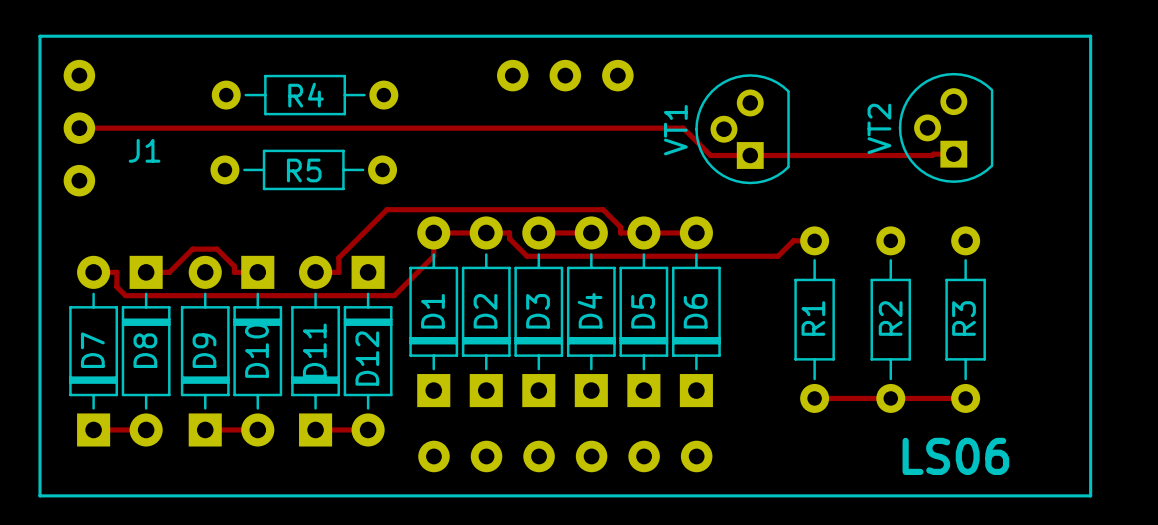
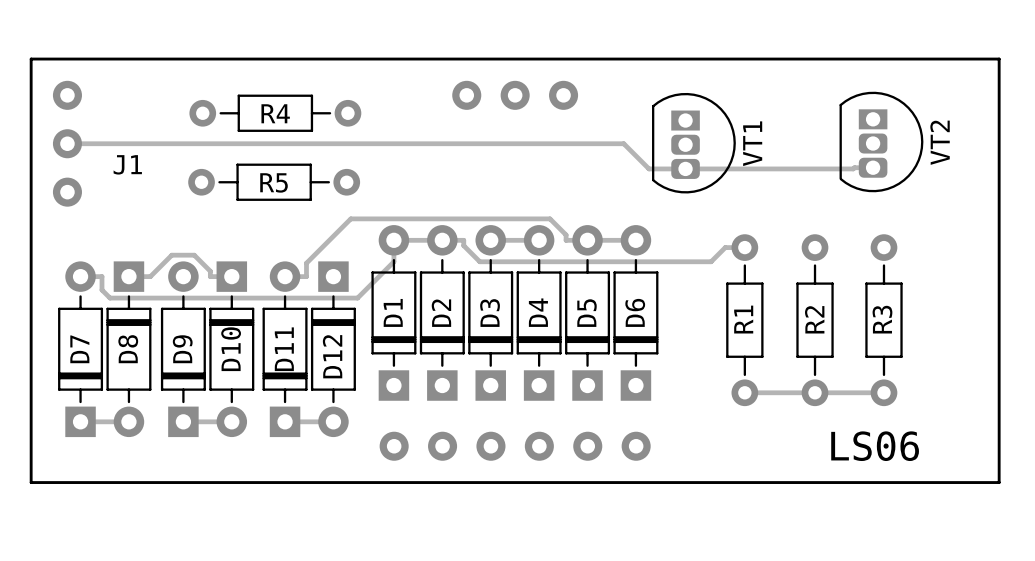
VT2 footprint: [898, 72, 994, 183] -> [839, 91, 924, 193]
VT1 footprint: [695, 74, 790, 185] -> [652, 92, 736, 194]
VT2 name position: VT2 (879, 128) -> VT2 (940, 142)
VT1 name position: VT1 (675, 130) -> VT1 (752, 143)

